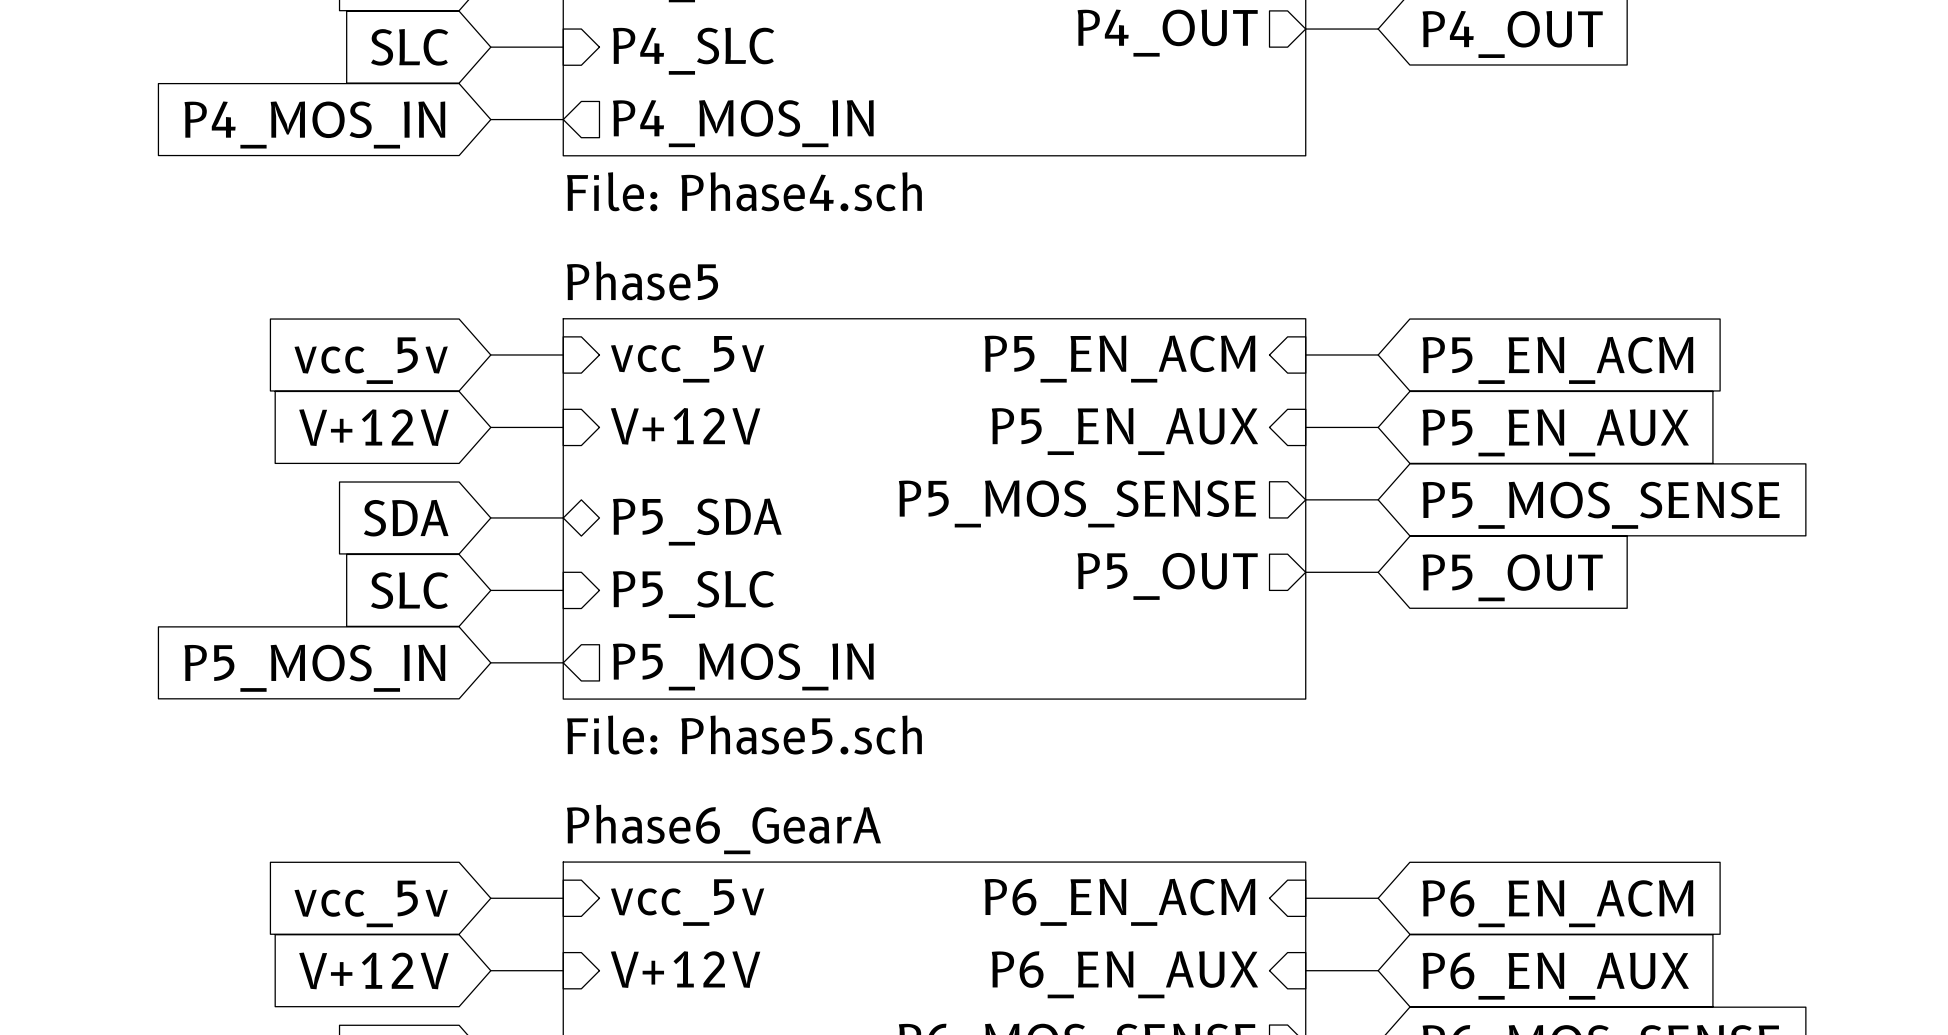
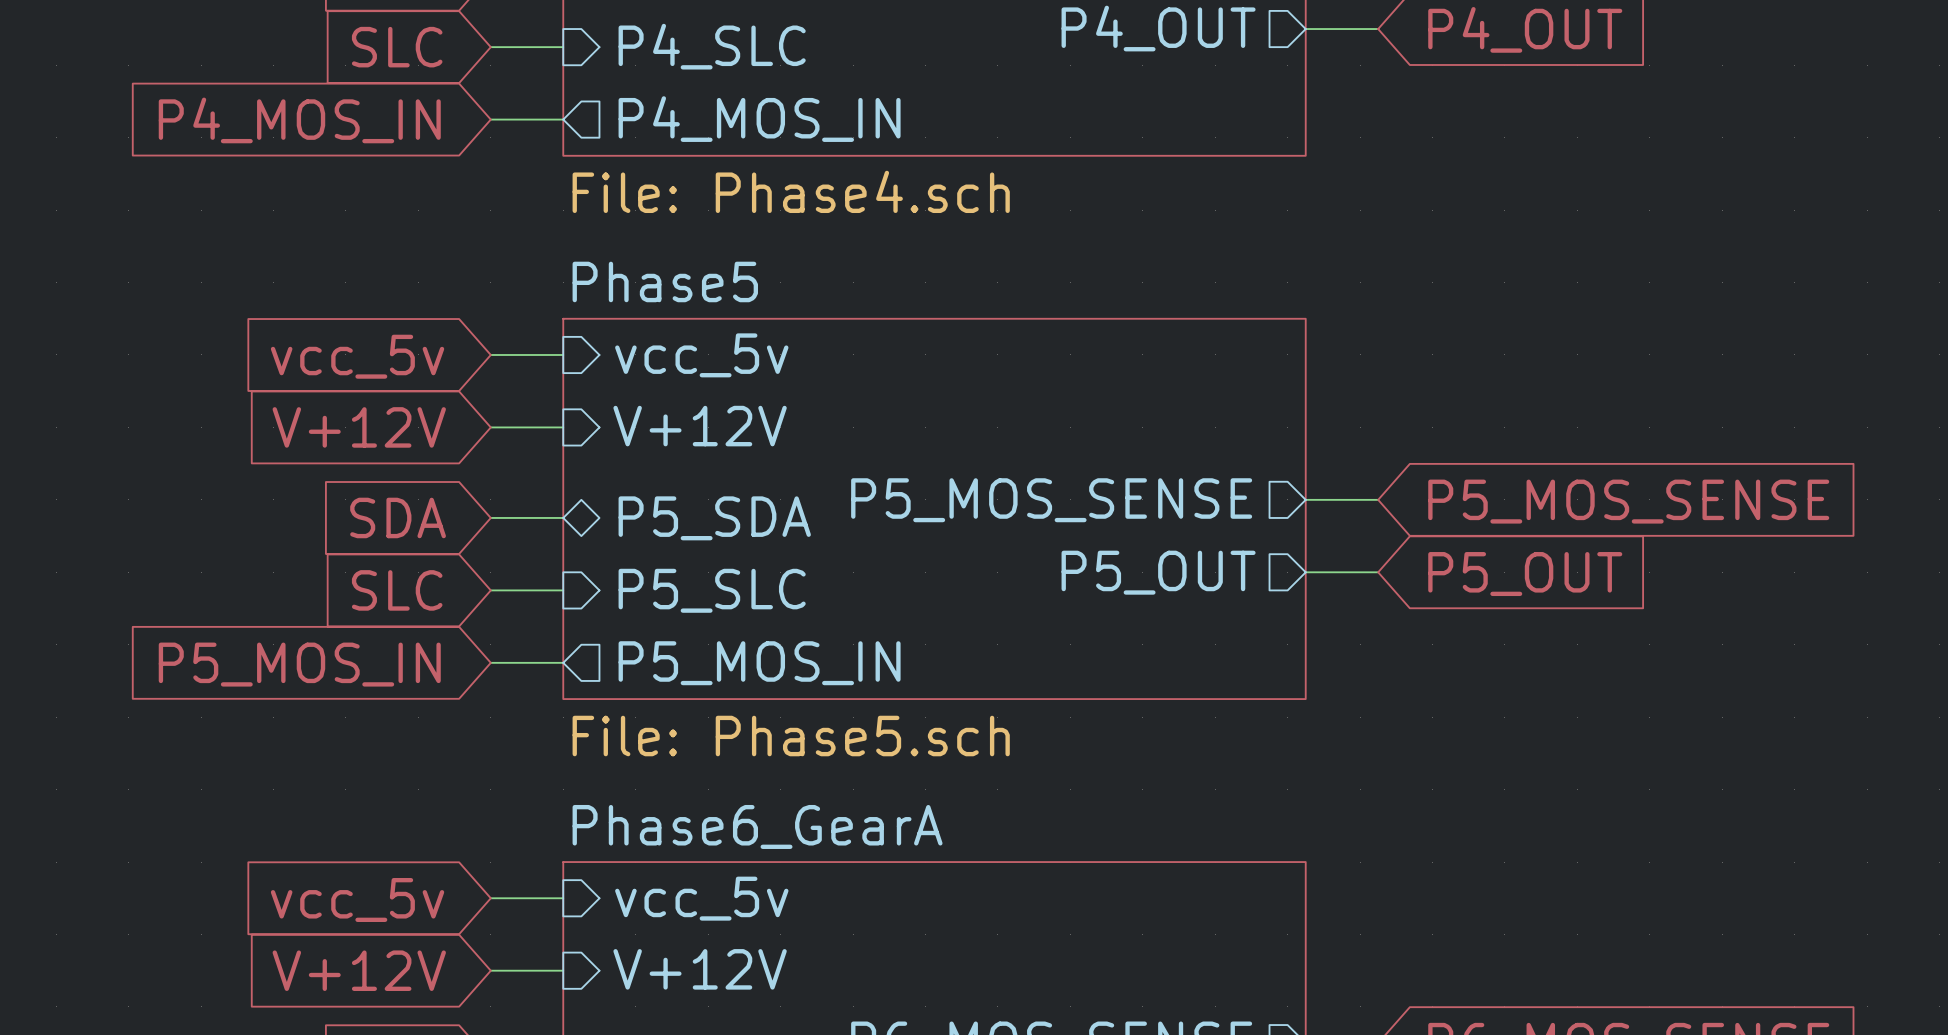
wire: (1305, 354) (1378, 354) -> none
sheet pin: P5_EN_ACM (1119, 359) -> none
global label: P5_EN_ACM (1557, 360) -> none
wire: (1305, 427) (1378, 427) -> none
sheet pin: P5_EN_AUX (1124, 431) -> none
global label: P5_EN_AUX (1555, 432) -> none
wire: (1305, 898) (1378, 898) -> none
sheet pin: P6_EN_ACM (1119, 902) -> none
global label: P6_EN_ACM (1557, 903) -> none
wire: (1305, 970) (1378, 970) -> none
sheet pin: P6_EN_AUX (1124, 974) -> none
global label: P6_EN_AUX (1555, 976) -> none

